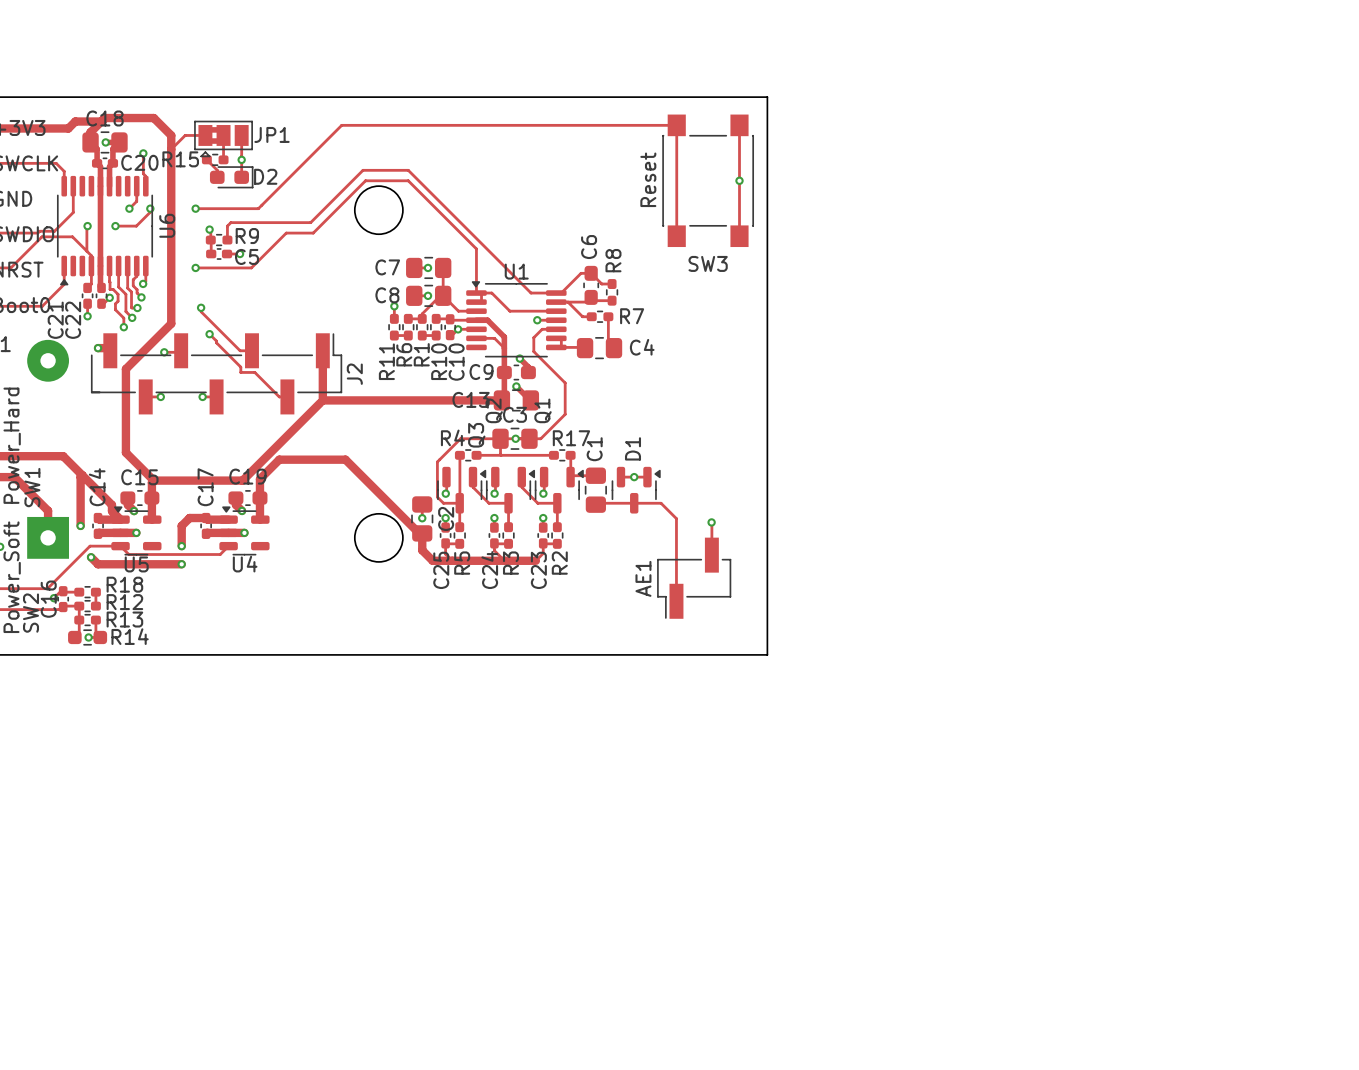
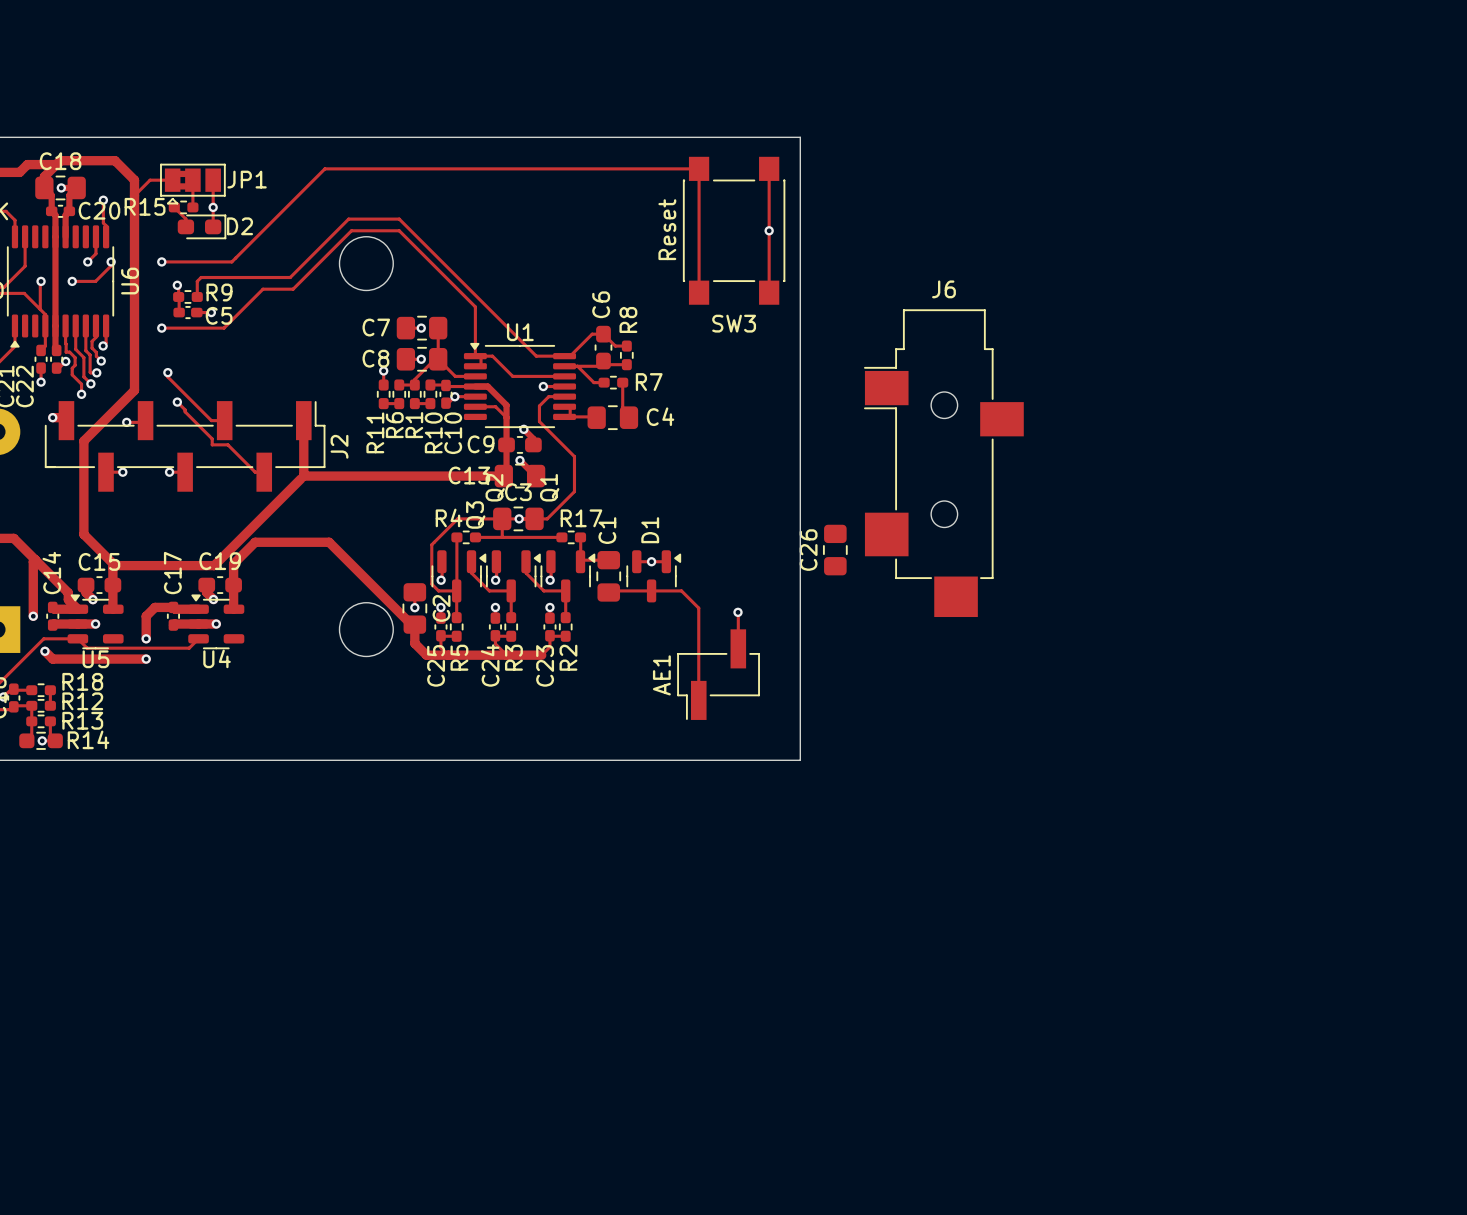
J6: none -> (943, 463)
C26: none -> (835, 550)

